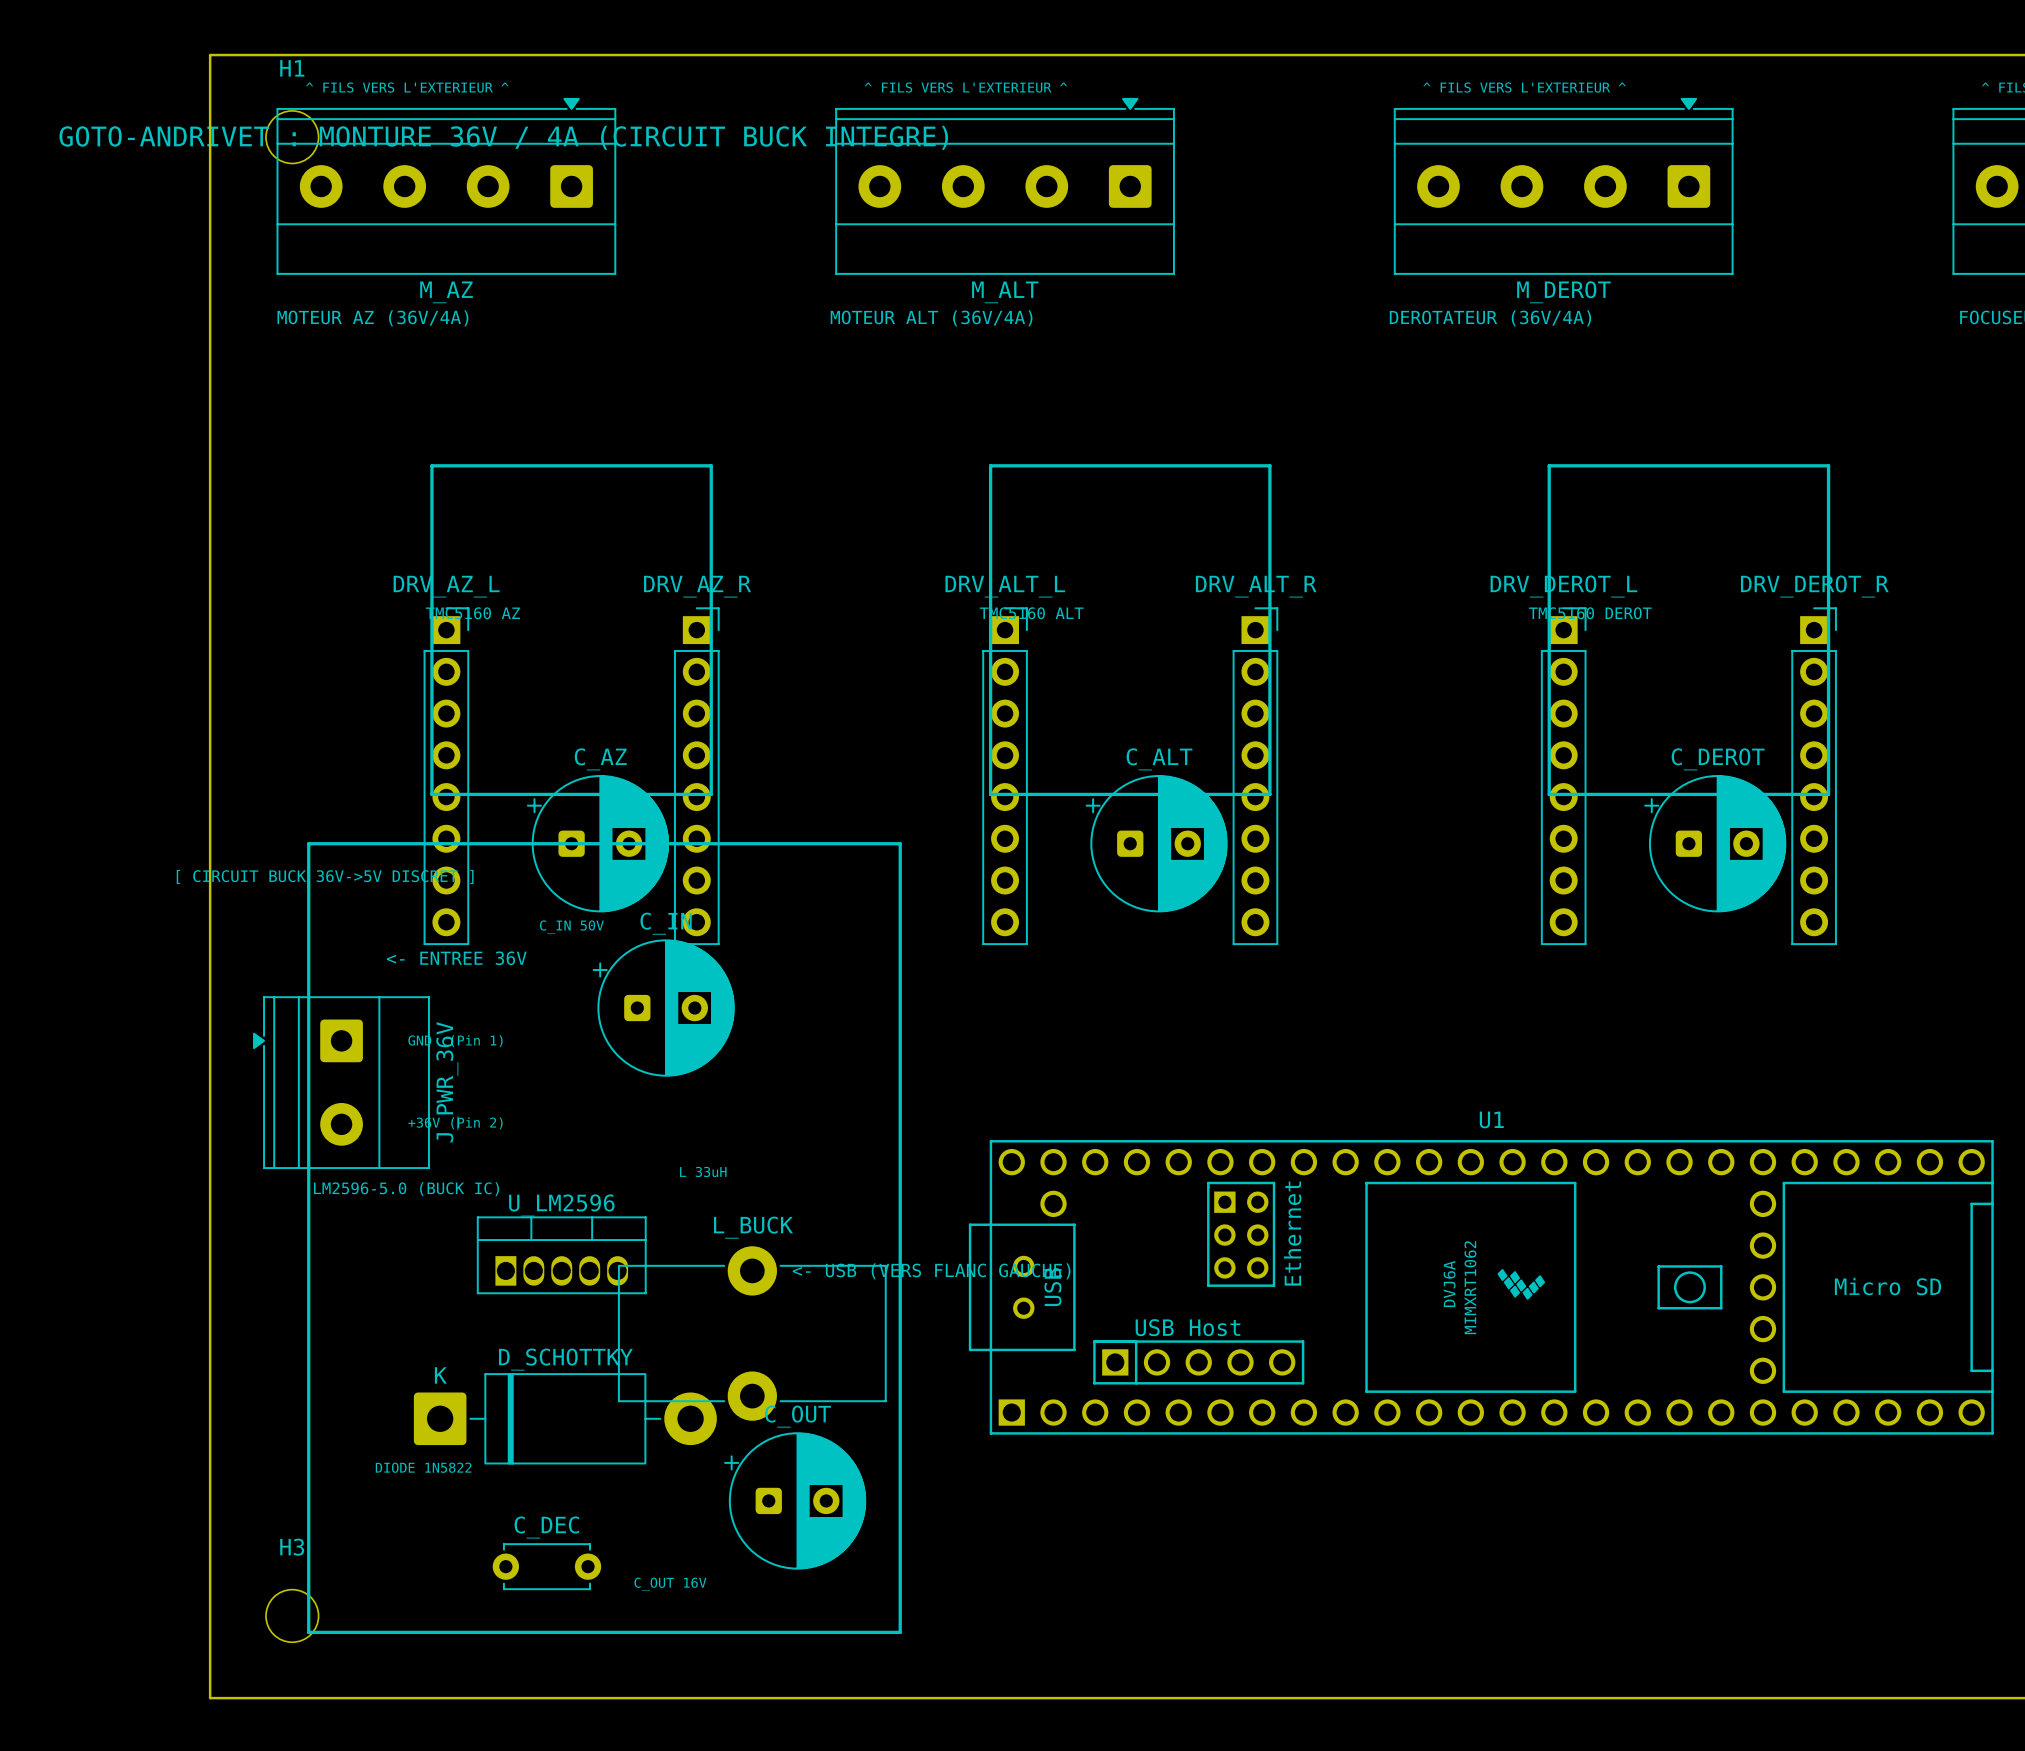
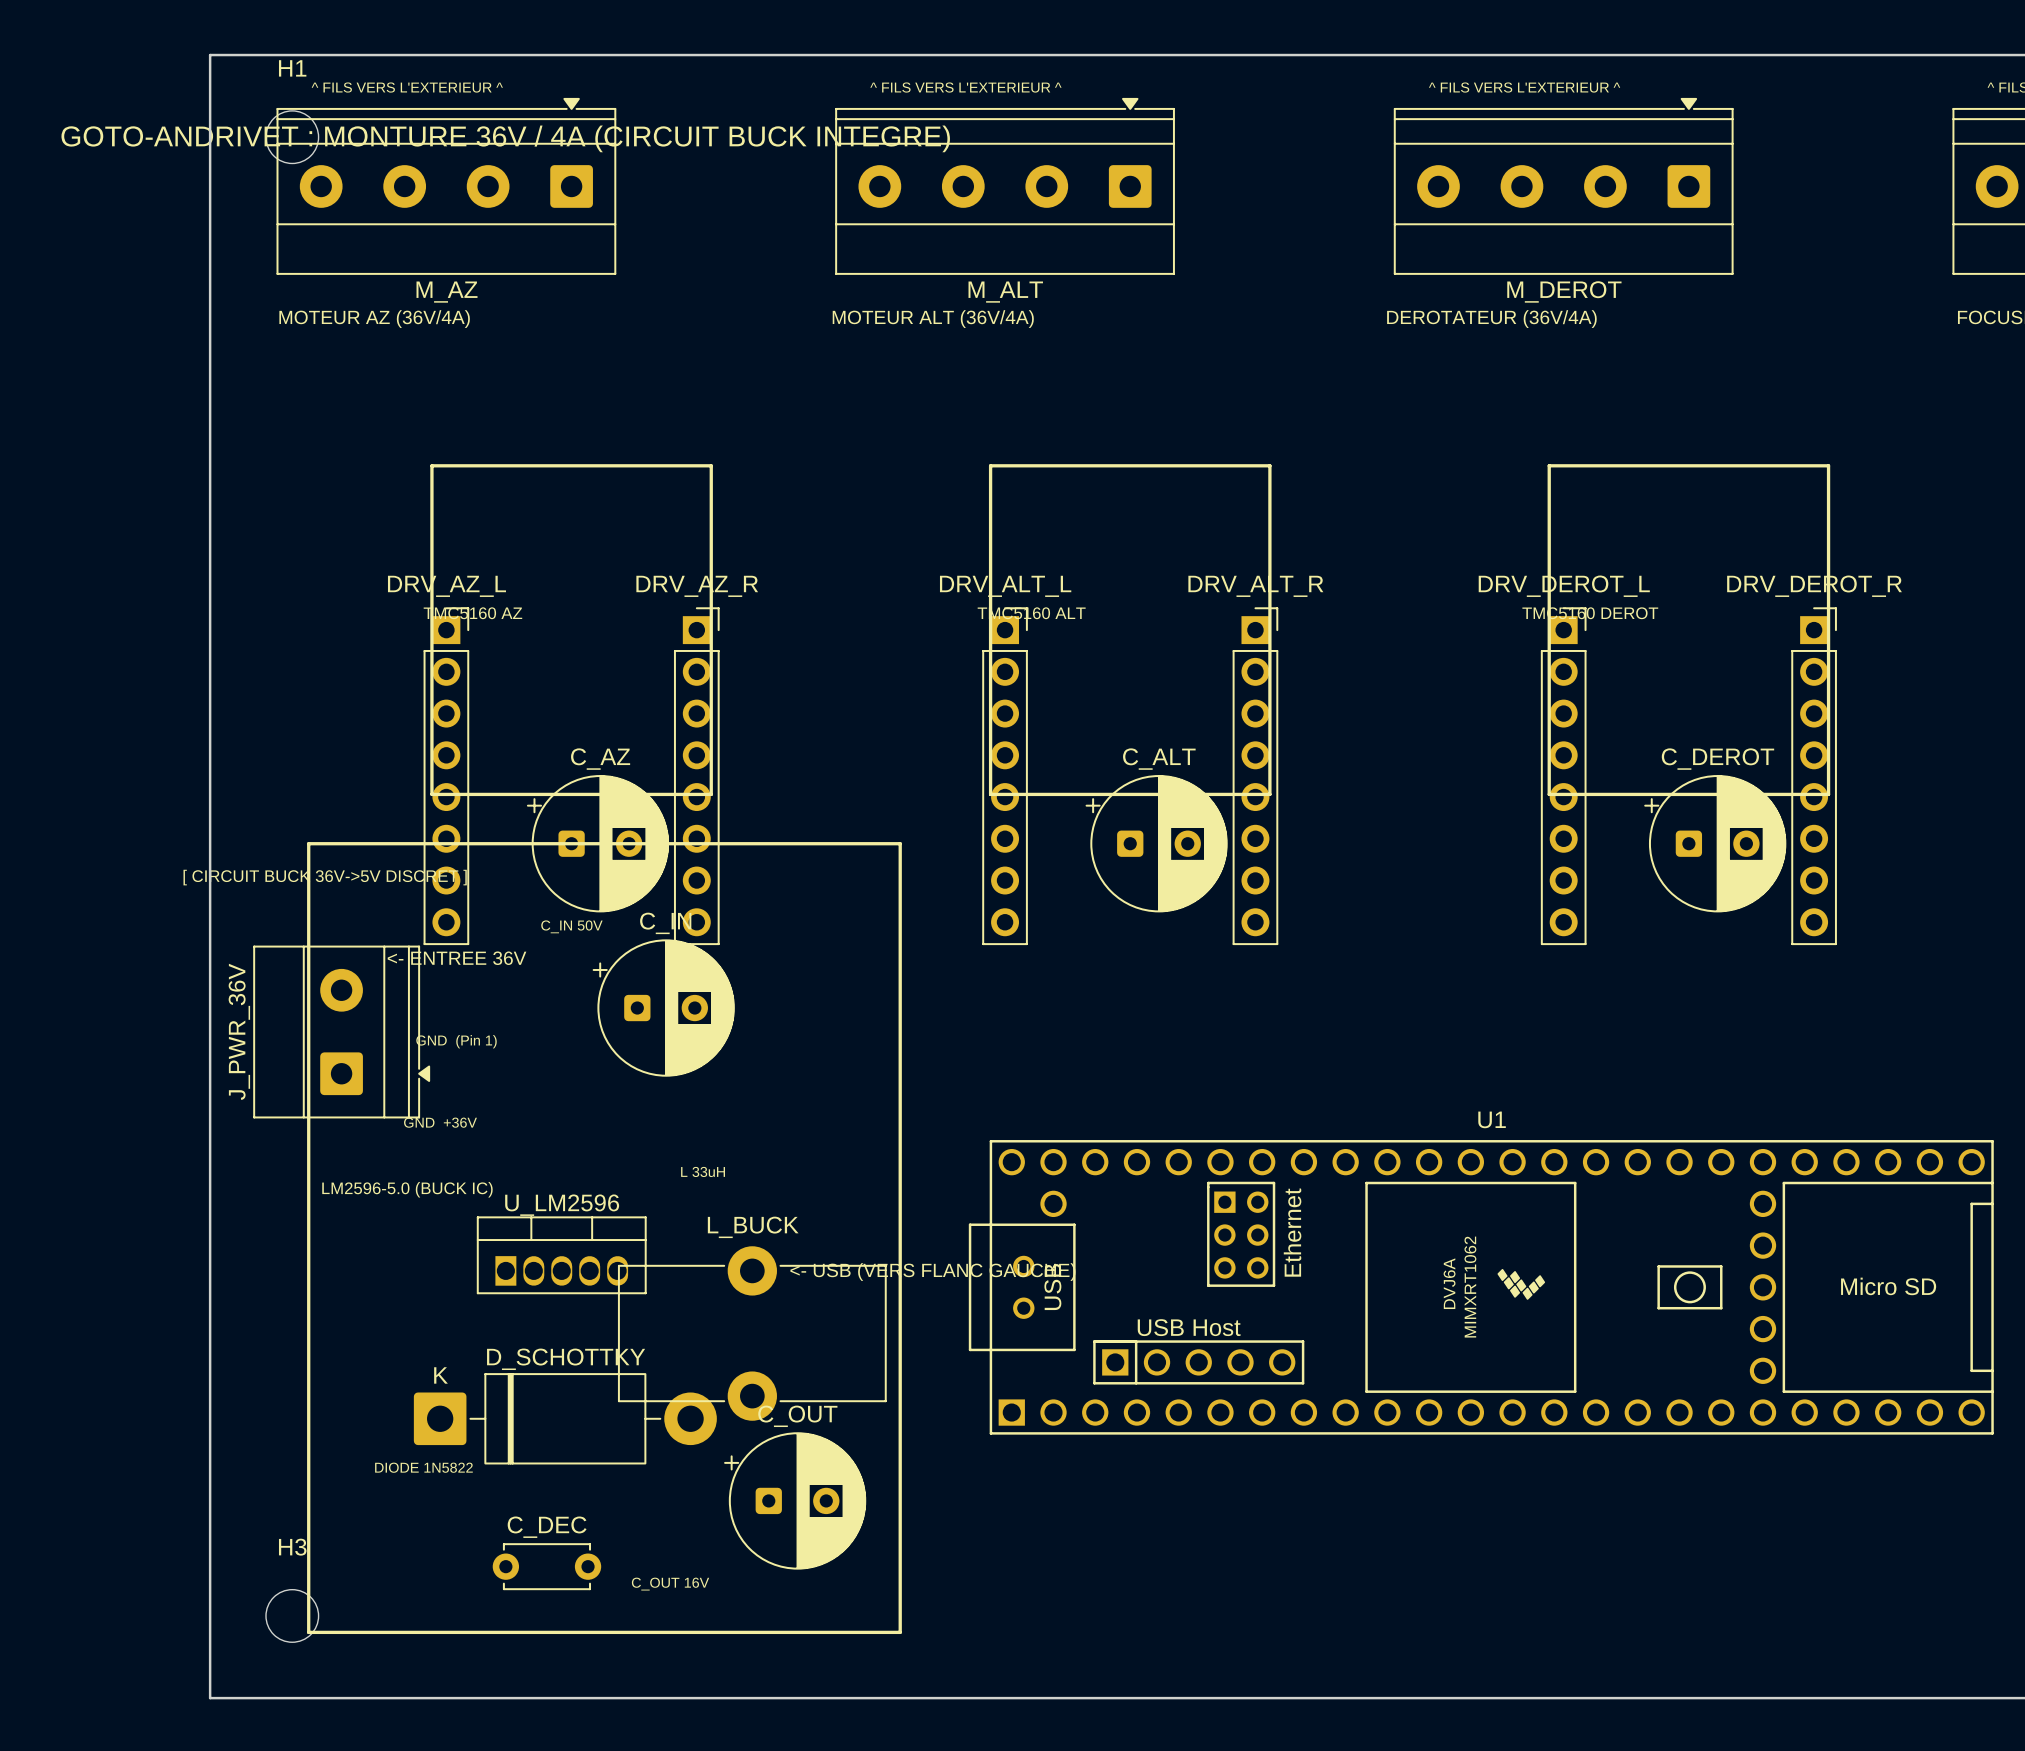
J_PWR_36V rotation: 0° (341, 1082) -> 180° (341, 1032)
text: +36V (Pin 2) (455, 1123) -> GND +36V (440, 1122)

